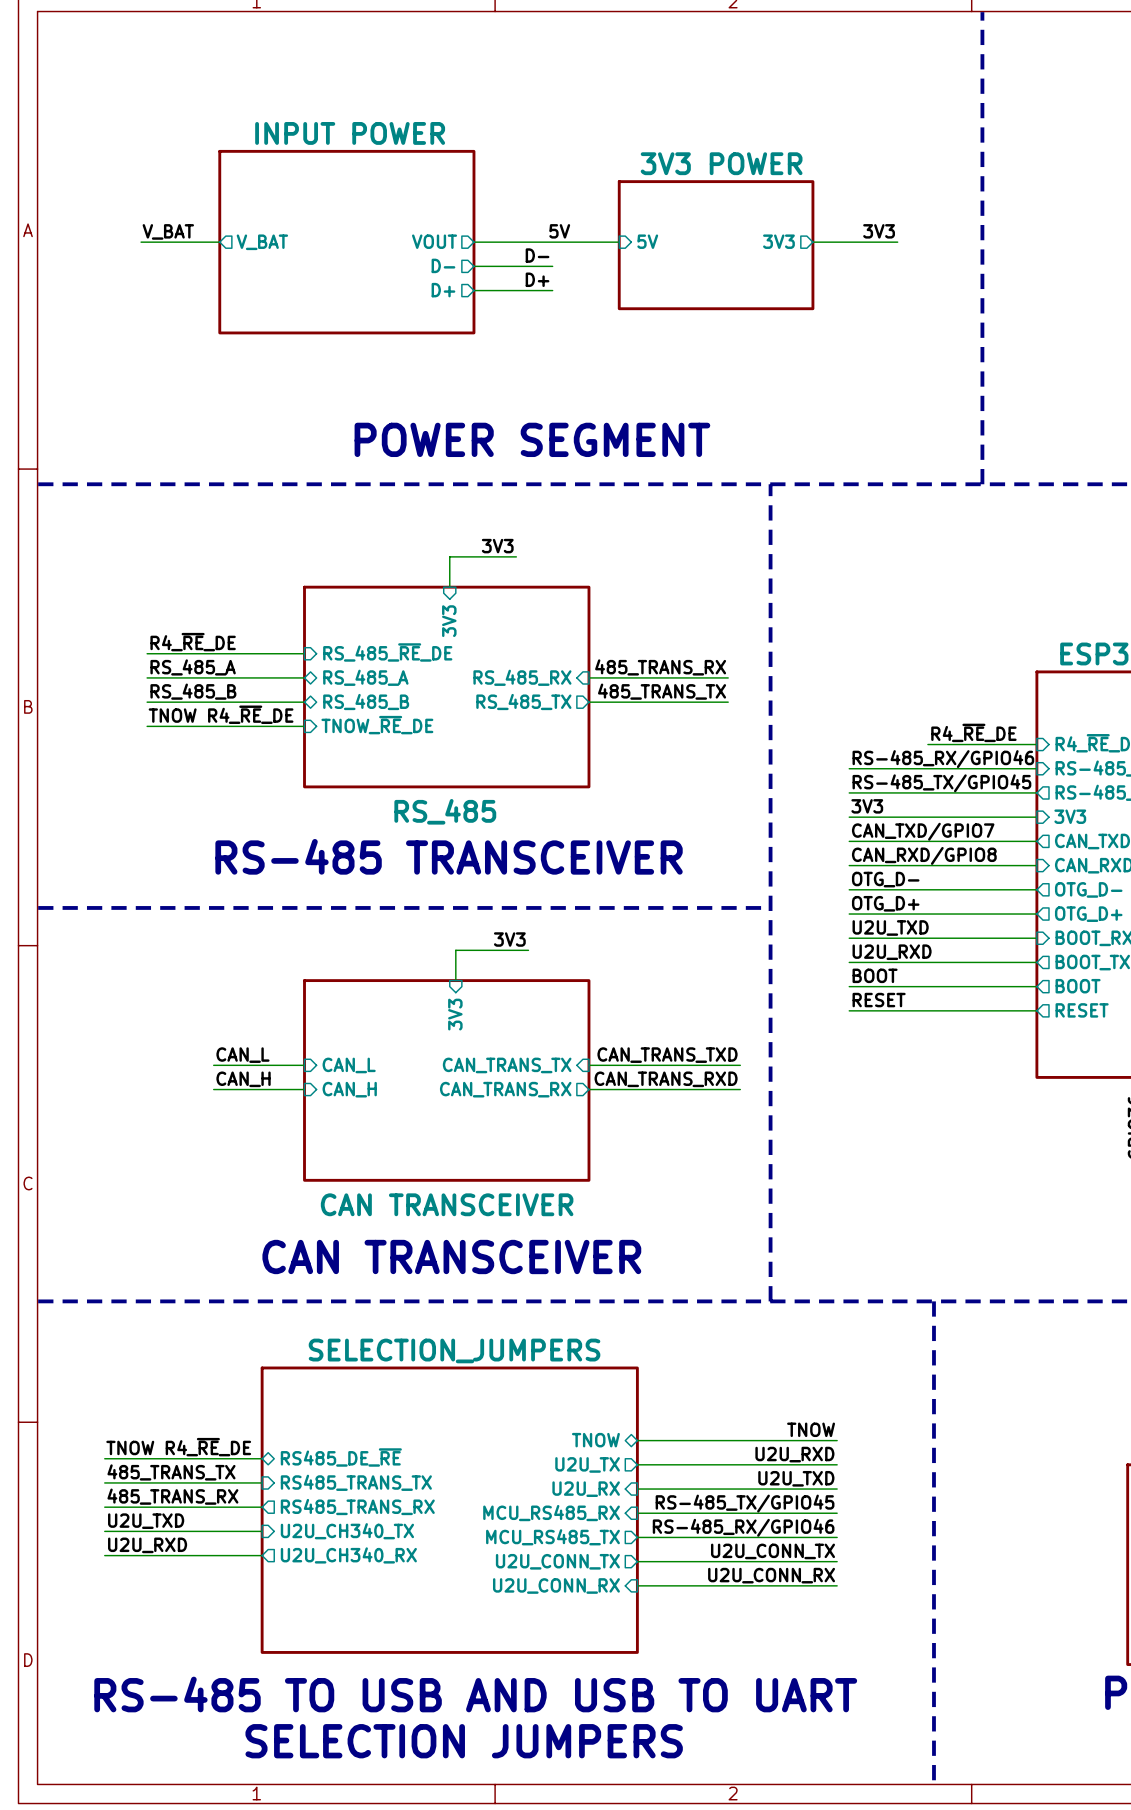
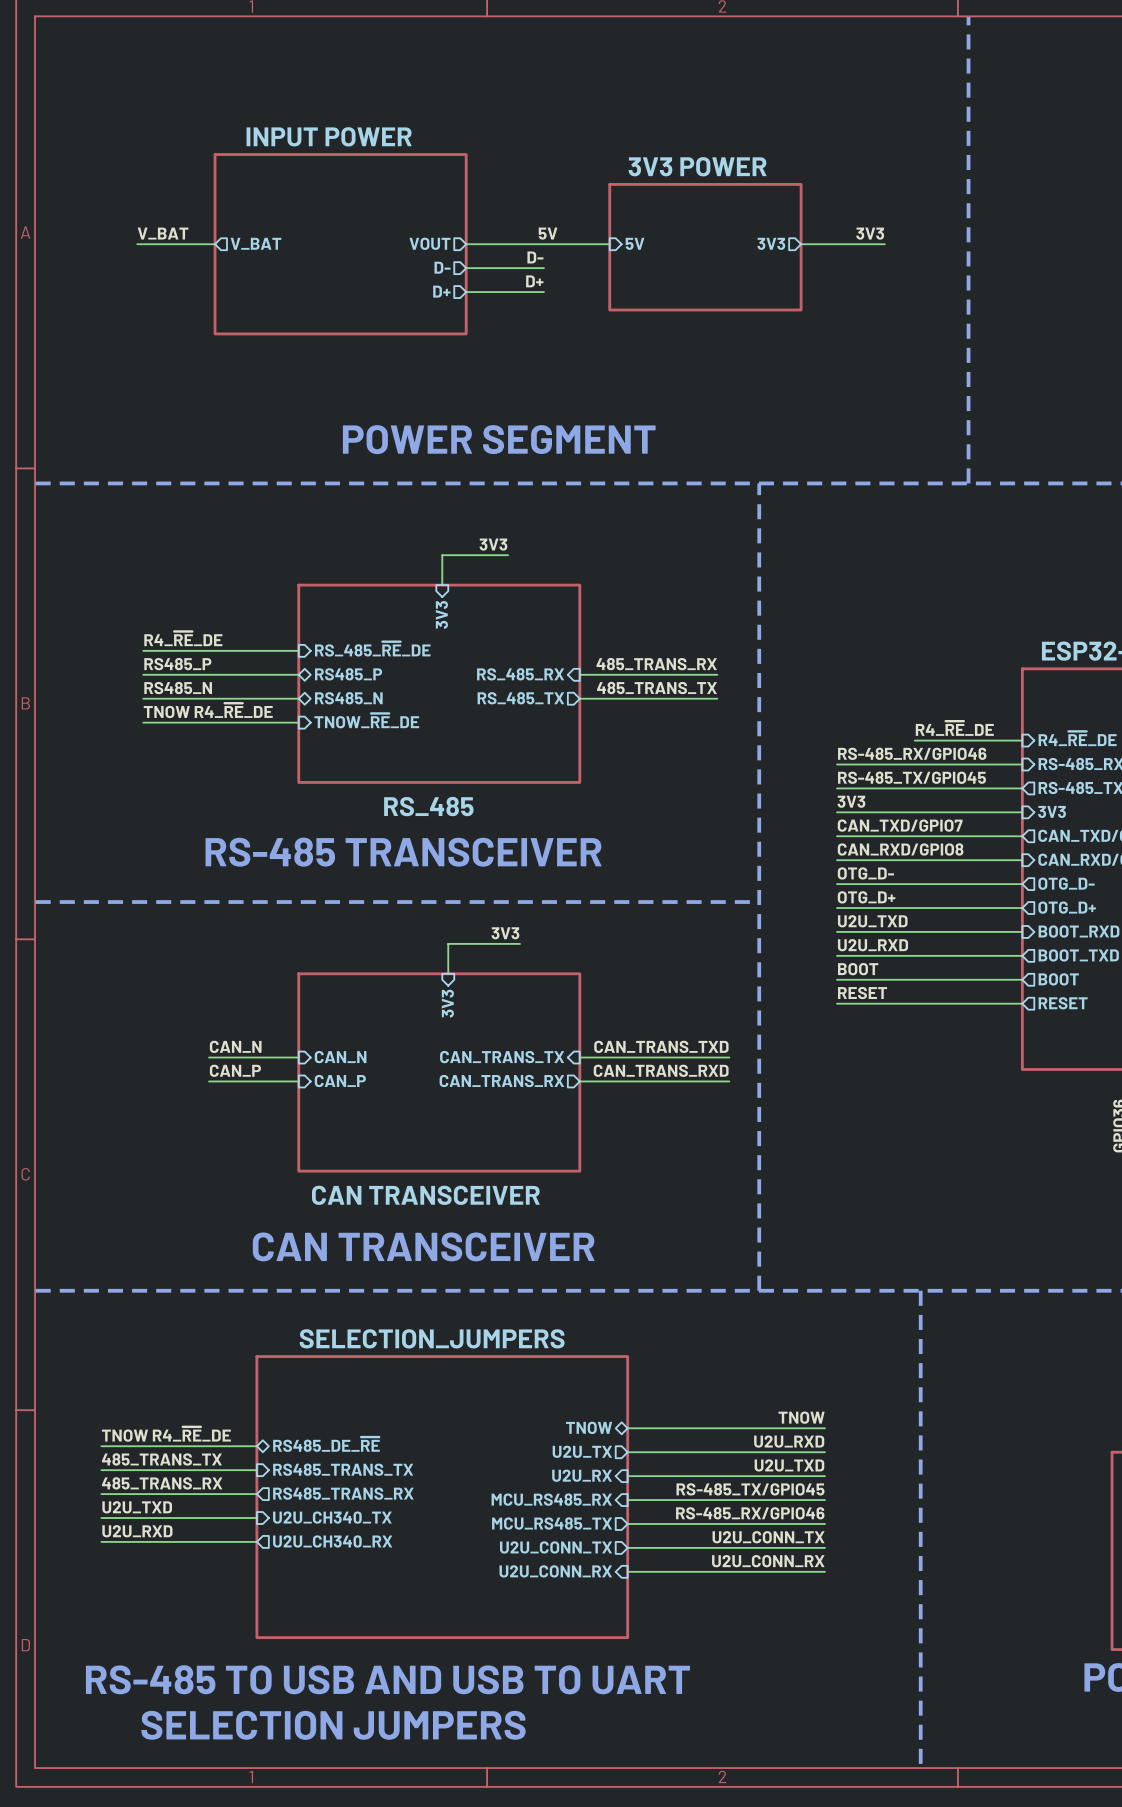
label: RS_485_A (193, 667) -> RS485_P (177, 664)
sheet pin: RS_485_A (365, 677) -> RS485_P (348, 674)
label: RS_485_B (193, 691) -> RS485_N (178, 688)
sheet pin: RS_485_B (366, 702) -> RS485_N (348, 698)
label: CAN_L (242, 1055) -> CAN_N (235, 1046)
sheet pin: CAN_L (349, 1065) -> CAN_N (340, 1057)
label: CAN_H (243, 1079) -> CAN_P (235, 1070)
sheet pin: CAN_H (349, 1089) -> CAN_P (340, 1081)

